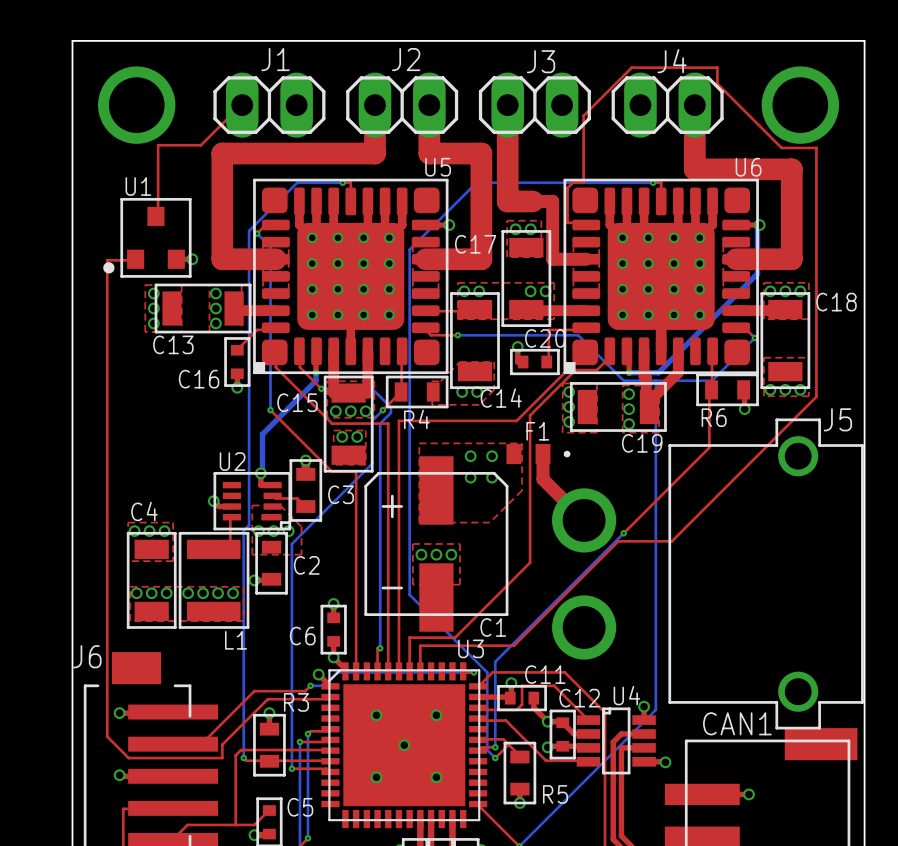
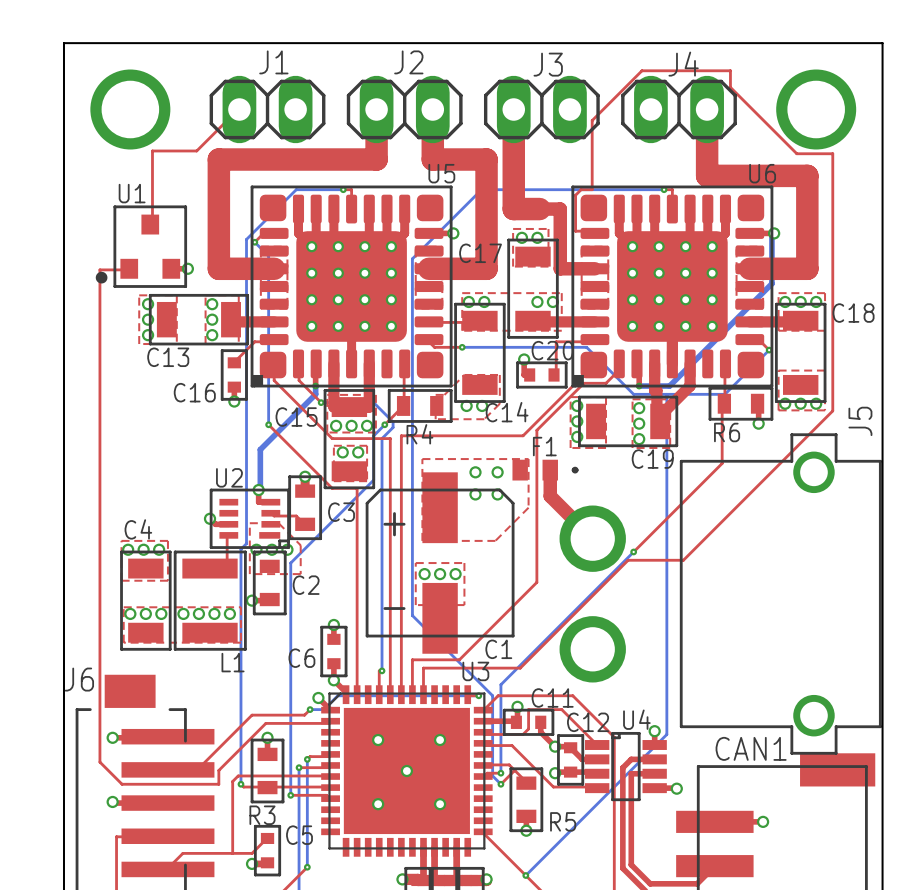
J5 name rotation: 0° (837, 419) -> 90° counterclockwise (860, 421)
R3 name position: R3 (296, 702) -> R3 (262, 815)

